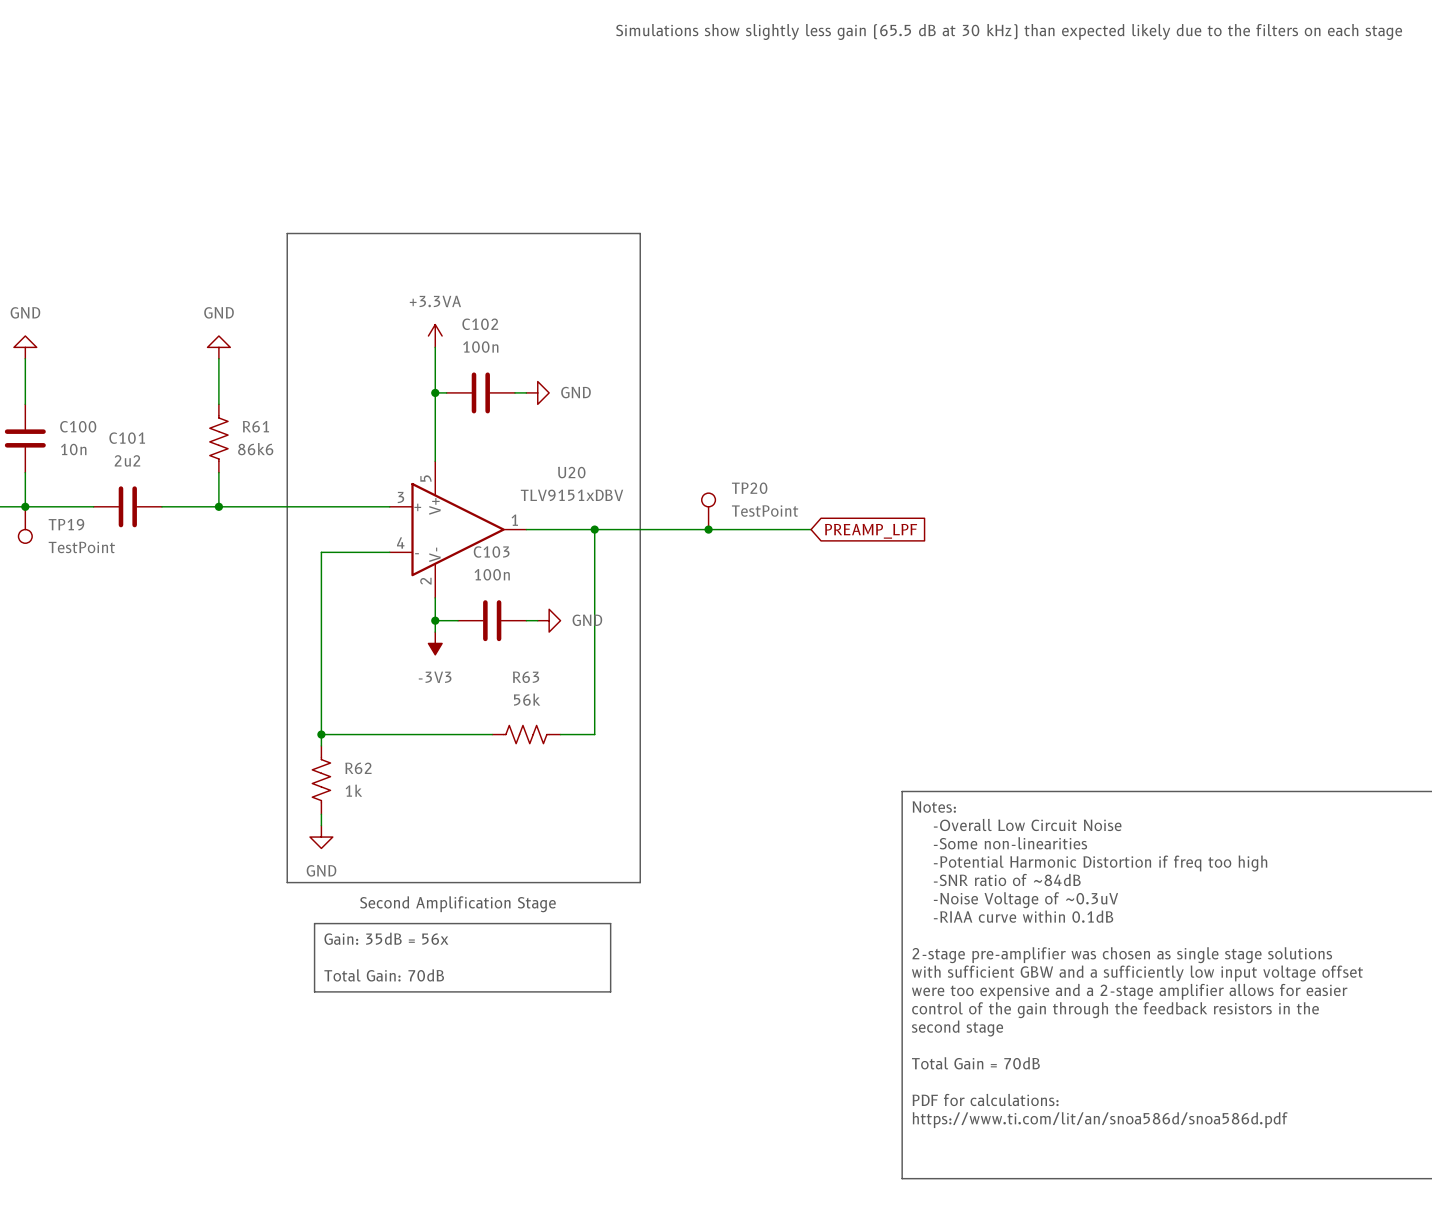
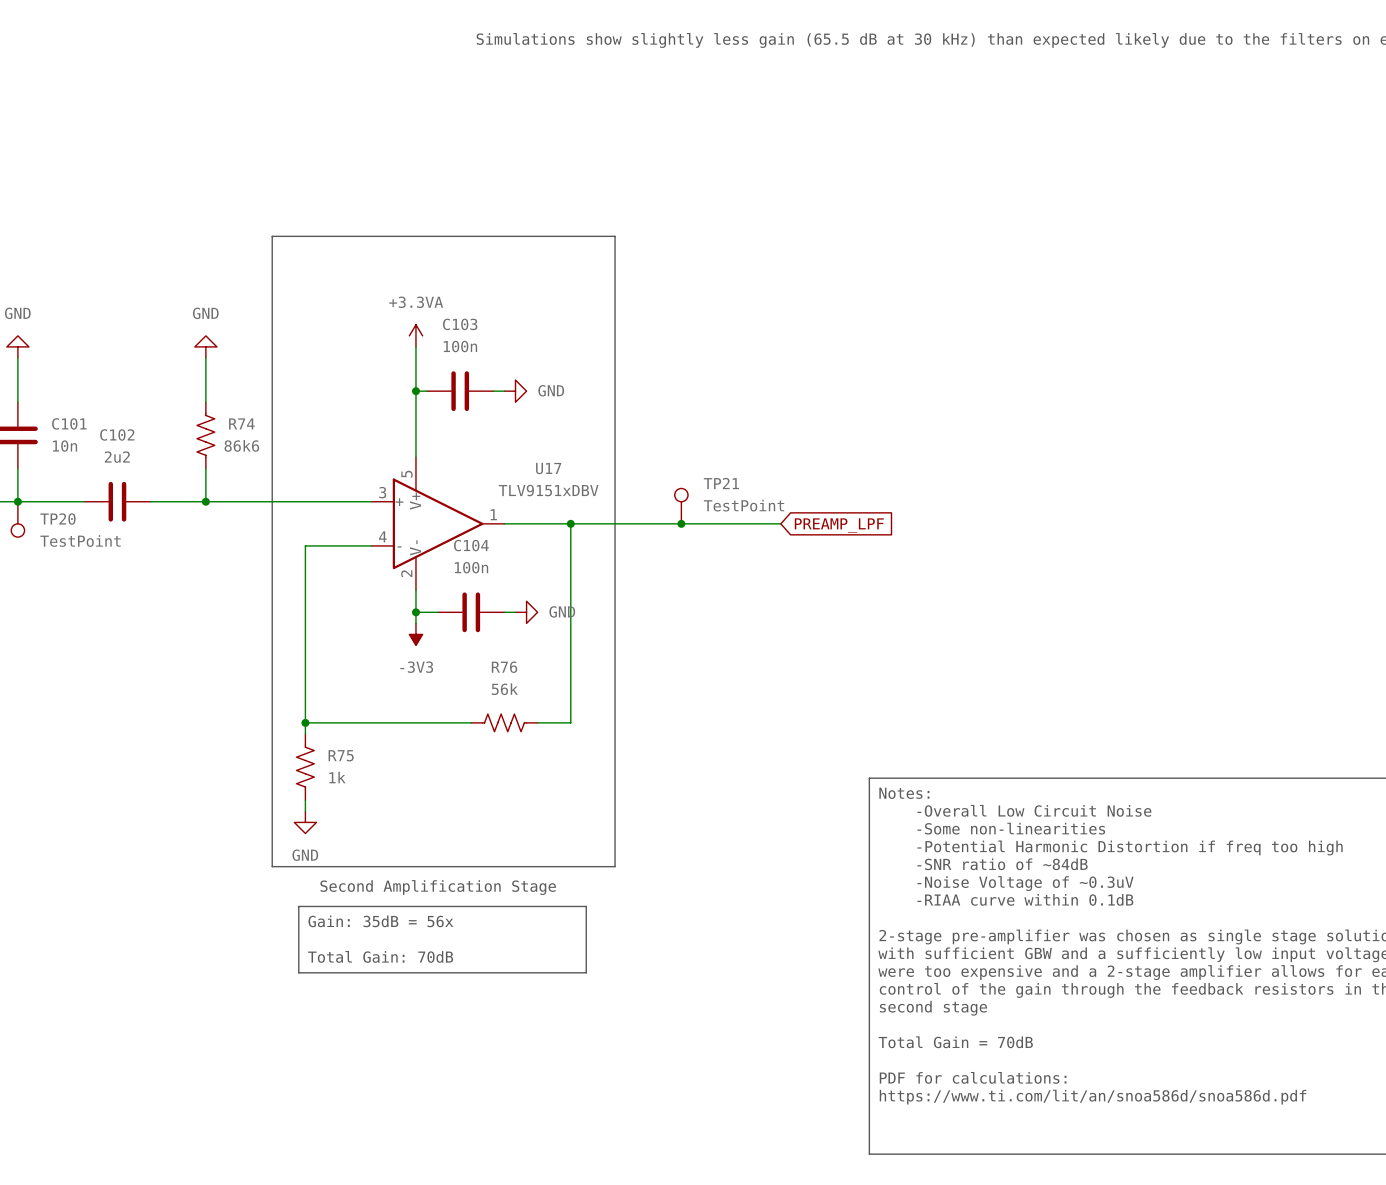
C102 name: C102 (480, 324) -> C103 (460, 324)
C100 name: C100 (78, 426) -> C101 (69, 423)
R61 name: R61 (255, 426) -> R74 (241, 423)
C101 name: C101 (127, 438) -> C102 (117, 434)
U20 name: U20 (571, 472) -> U17 (548, 468)
TP20 name: TP20 (749, 488) -> TP21 (721, 483)
TP19 name: TP19 (66, 524) -> TP20 (57, 519)
C103 name: C103 (491, 551) -> C104 (471, 545)
R63 name: R63 (526, 677) -> R76 (504, 667)
R62 name: R62 (358, 768) -> R75 (341, 755)

